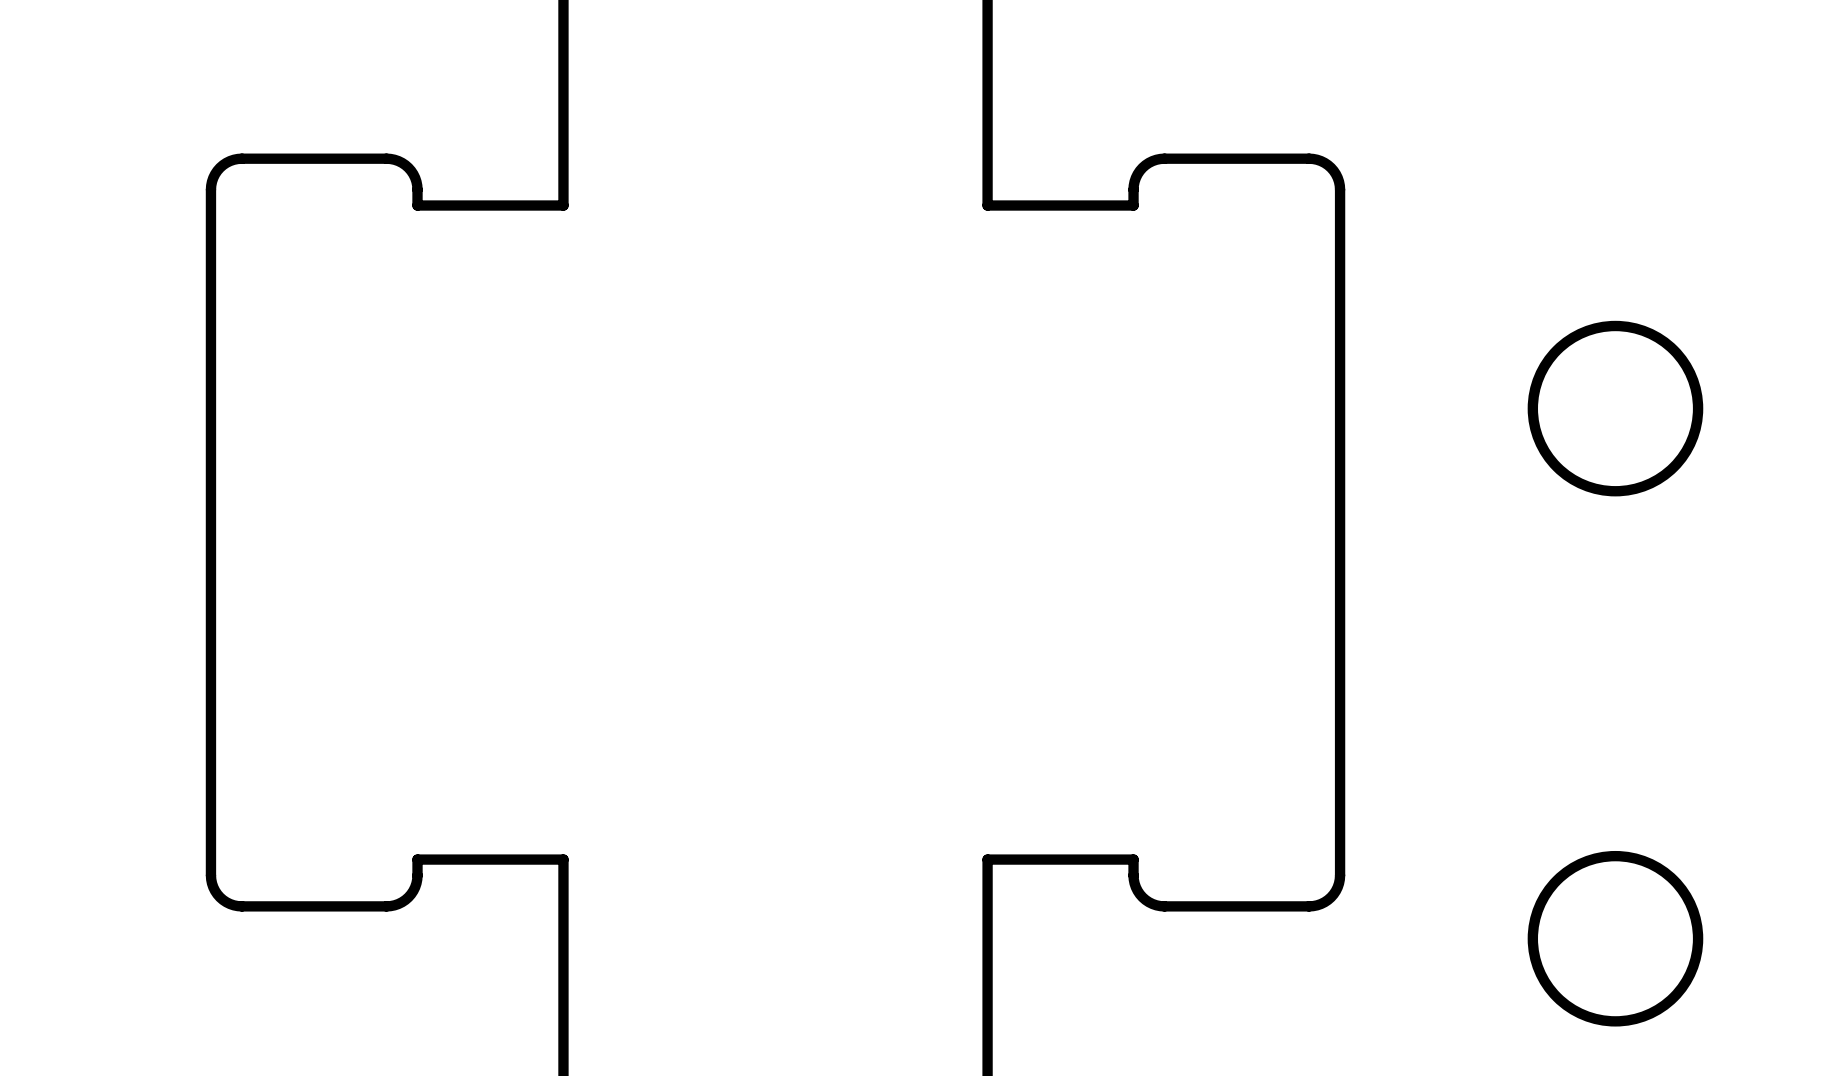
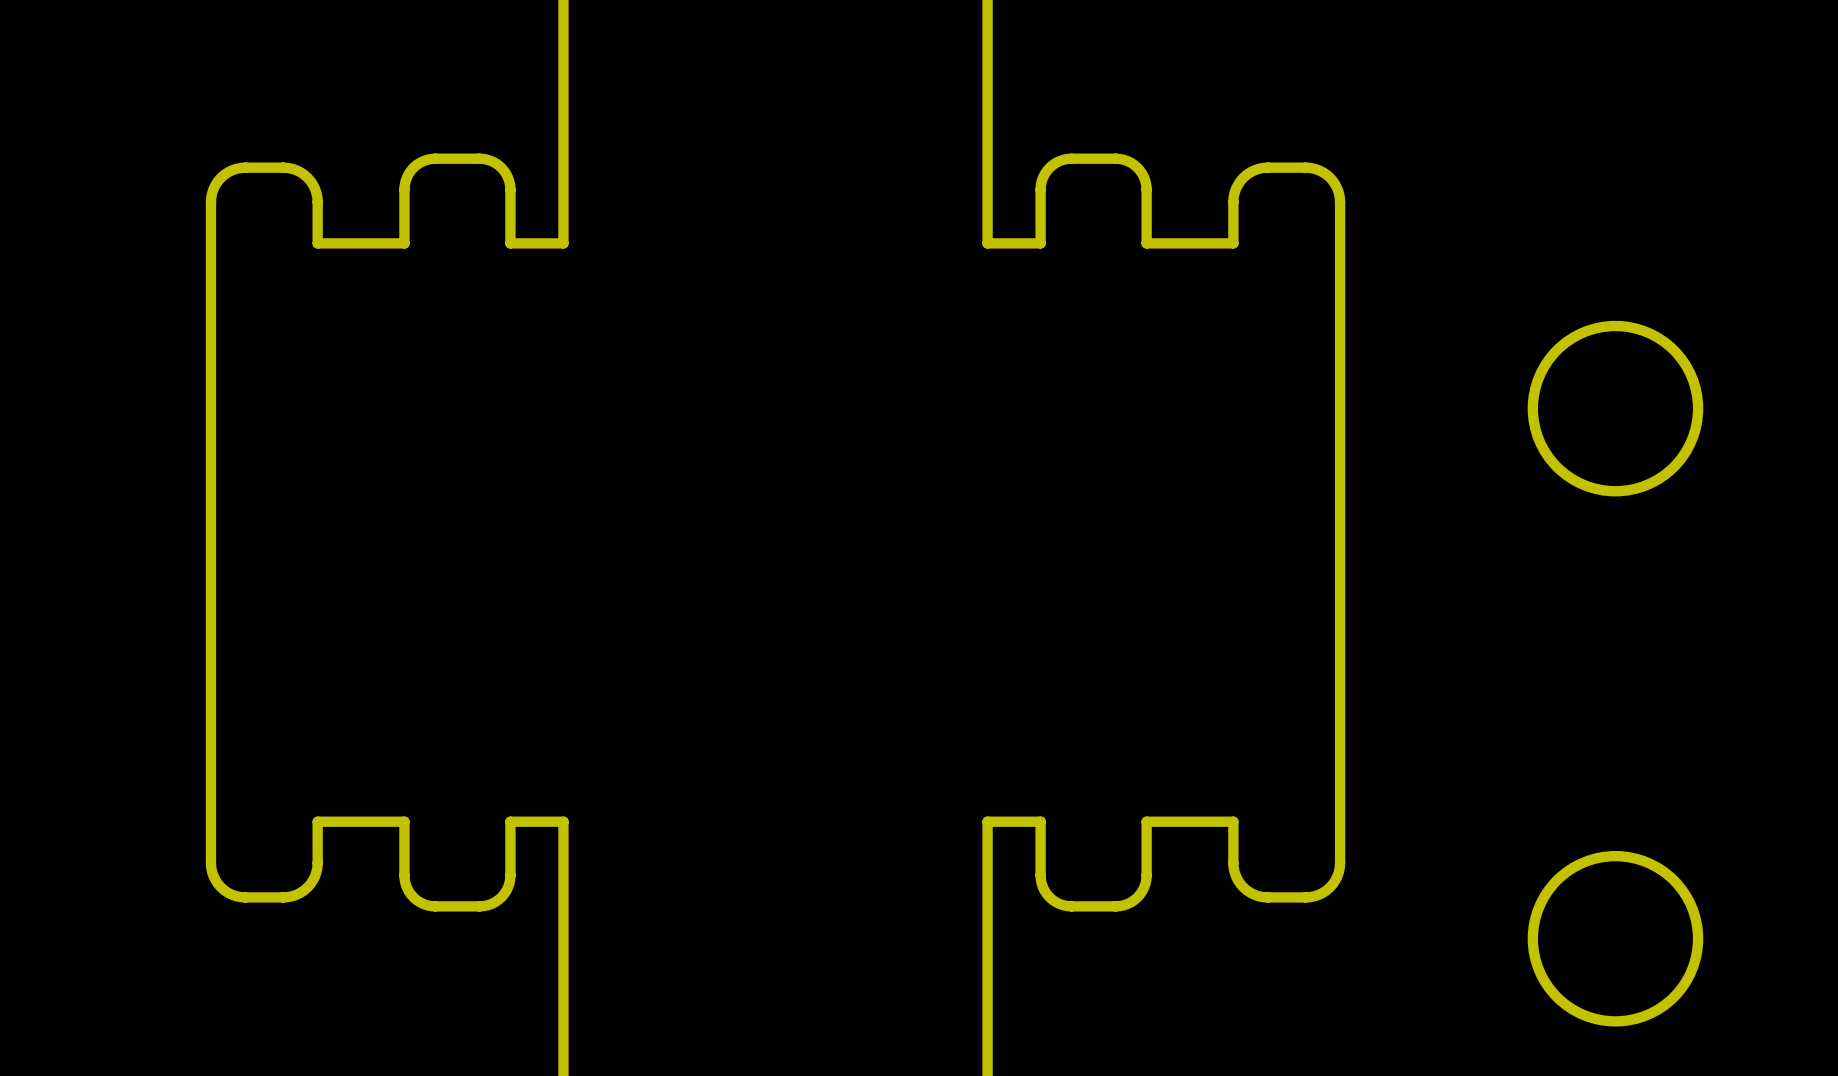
board edge: (210, 202) (211, 185) (215, 174) (223, 165) (233, 159) (386, 158) (402, 162) (413, 174) (417, 185) (417, 205) (563, 205) -> (210, 202) (215, 184) (221, 177) (232, 170) (245, 167) (292, 168) (307, 177) (315, 188) (317, 202) (317, 243) (404, 243) (404, 185) (408, 174) (413, 167) (419, 162) (431, 158) (479, 158) (491, 161) (498, 165) (508, 177) (510, 189) (510, 243) (563, 243) (563, 205)
board edge: (1340, 202) (1339, 185) (1335, 174) (1327, 165) (1317, 159) (1164, 158) (1149, 162) (1137, 174) (1133, 185) (1133, 205) (987, 205) -> (1340, 202) (1337, 188) (1332, 181) (1318, 170) (1305, 167) (1258, 168) (1243, 177) (1235, 188) (1233, 202) (1233, 243) (1146, 243) (1146, 185) (1142, 174) (1137, 167) (1127, 161) (1119, 158) (1071, 158) (1056, 162) (1049, 167) (1042, 177) (1040, 189) (1040, 243) (987, 243) (987, 205)
board edge: (563, 859) (417, 859) (417, 879) (413, 890) (402, 902) (386, 906) (233, 905) (223, 899) (215, 890) (211, 879) (210, 863) -> (563, 859) (563, 821) (510, 821) (510, 875) (508, 887) (498, 899) (487, 905) (479, 906) (431, 906) (423, 904) (413, 897) (408, 890) (404, 879) (404, 821) (317, 821) (317, 863) (315, 876) (304, 890) (292, 896) (245, 897) (232, 894) (224, 890) (215, 880) (210, 863)
board edge: (987, 859) (1133, 859) (1133, 879) (1137, 890) (1149, 902) (1164, 906) (1317, 905) (1327, 899) (1335, 890) (1339, 879) (1340, 863) -> (987, 859) (987, 821) (1040, 821) (1040, 875) (1042, 887) (1052, 899) (1059, 904) (1071, 906) (1119, 906) (1131, 902) (1137, 897) (1142, 890) (1146, 879) (1146, 821) (1233, 821) (1233, 863) (1235, 876) (1243, 887) (1258, 896) (1305, 897) (1318, 894) (1329, 887) (1335, 880) (1340, 863)

